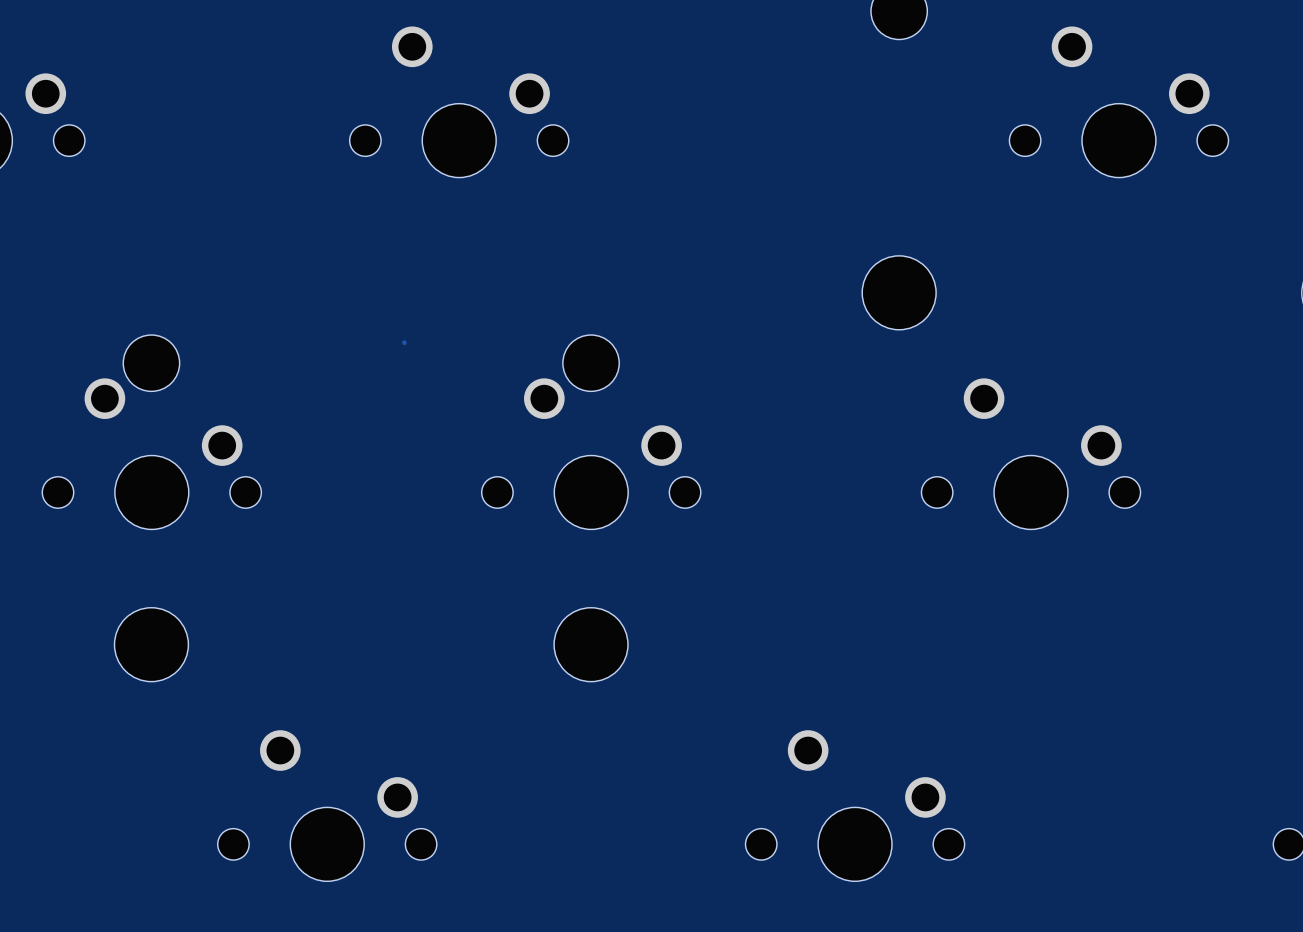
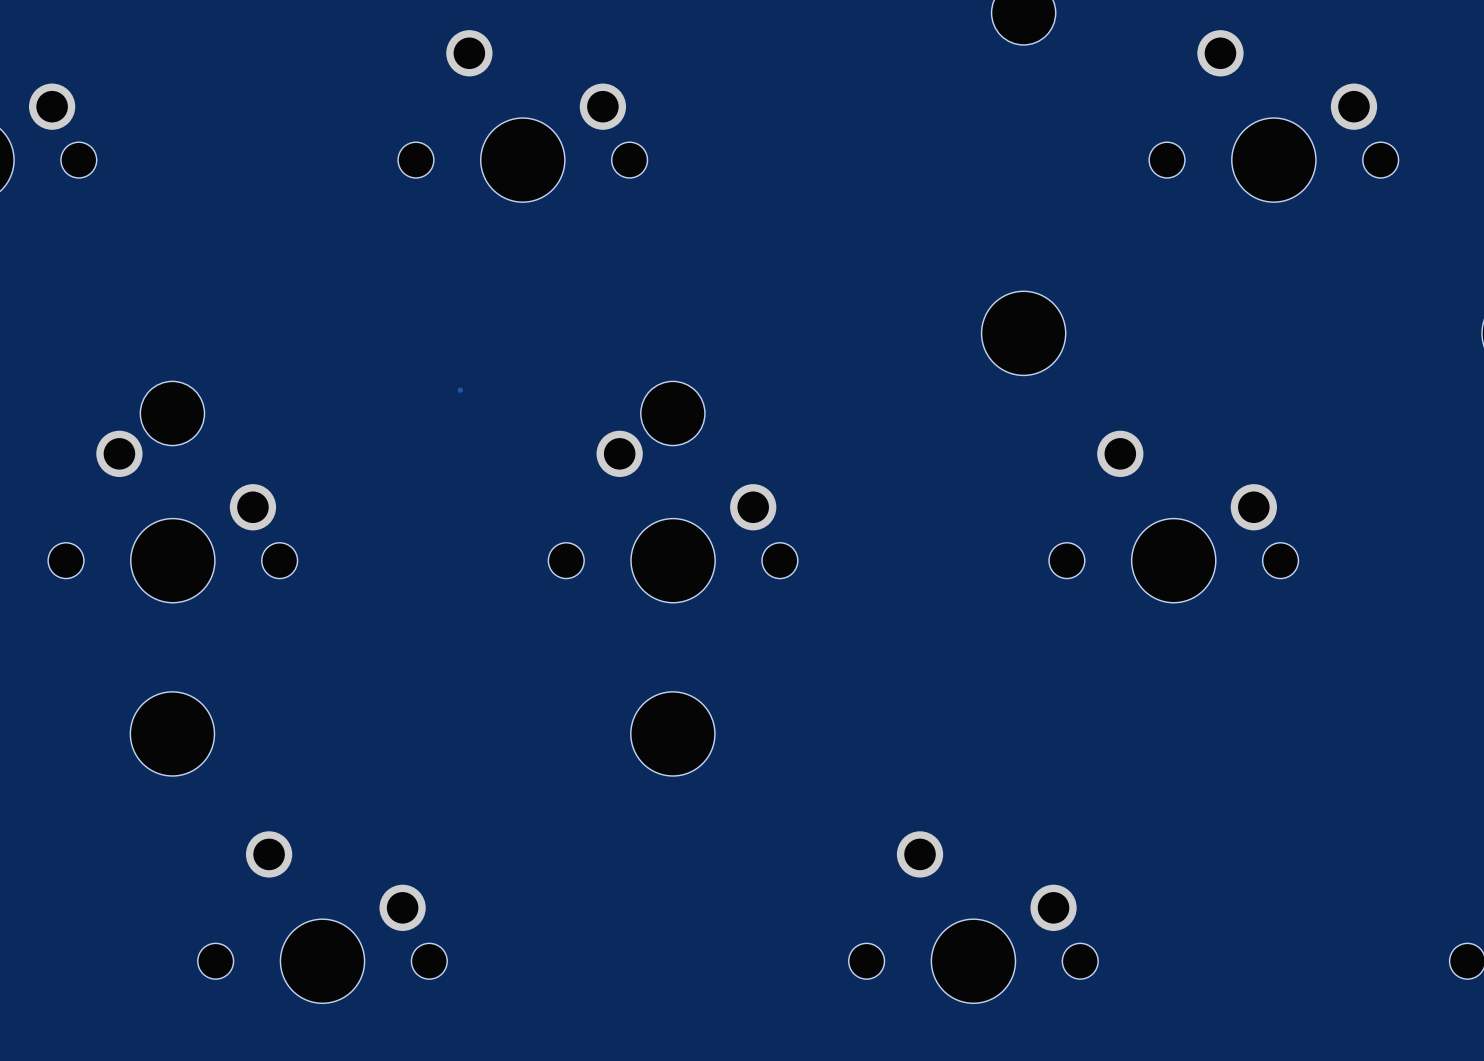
part position: (327, 805) -> (322, 917)

